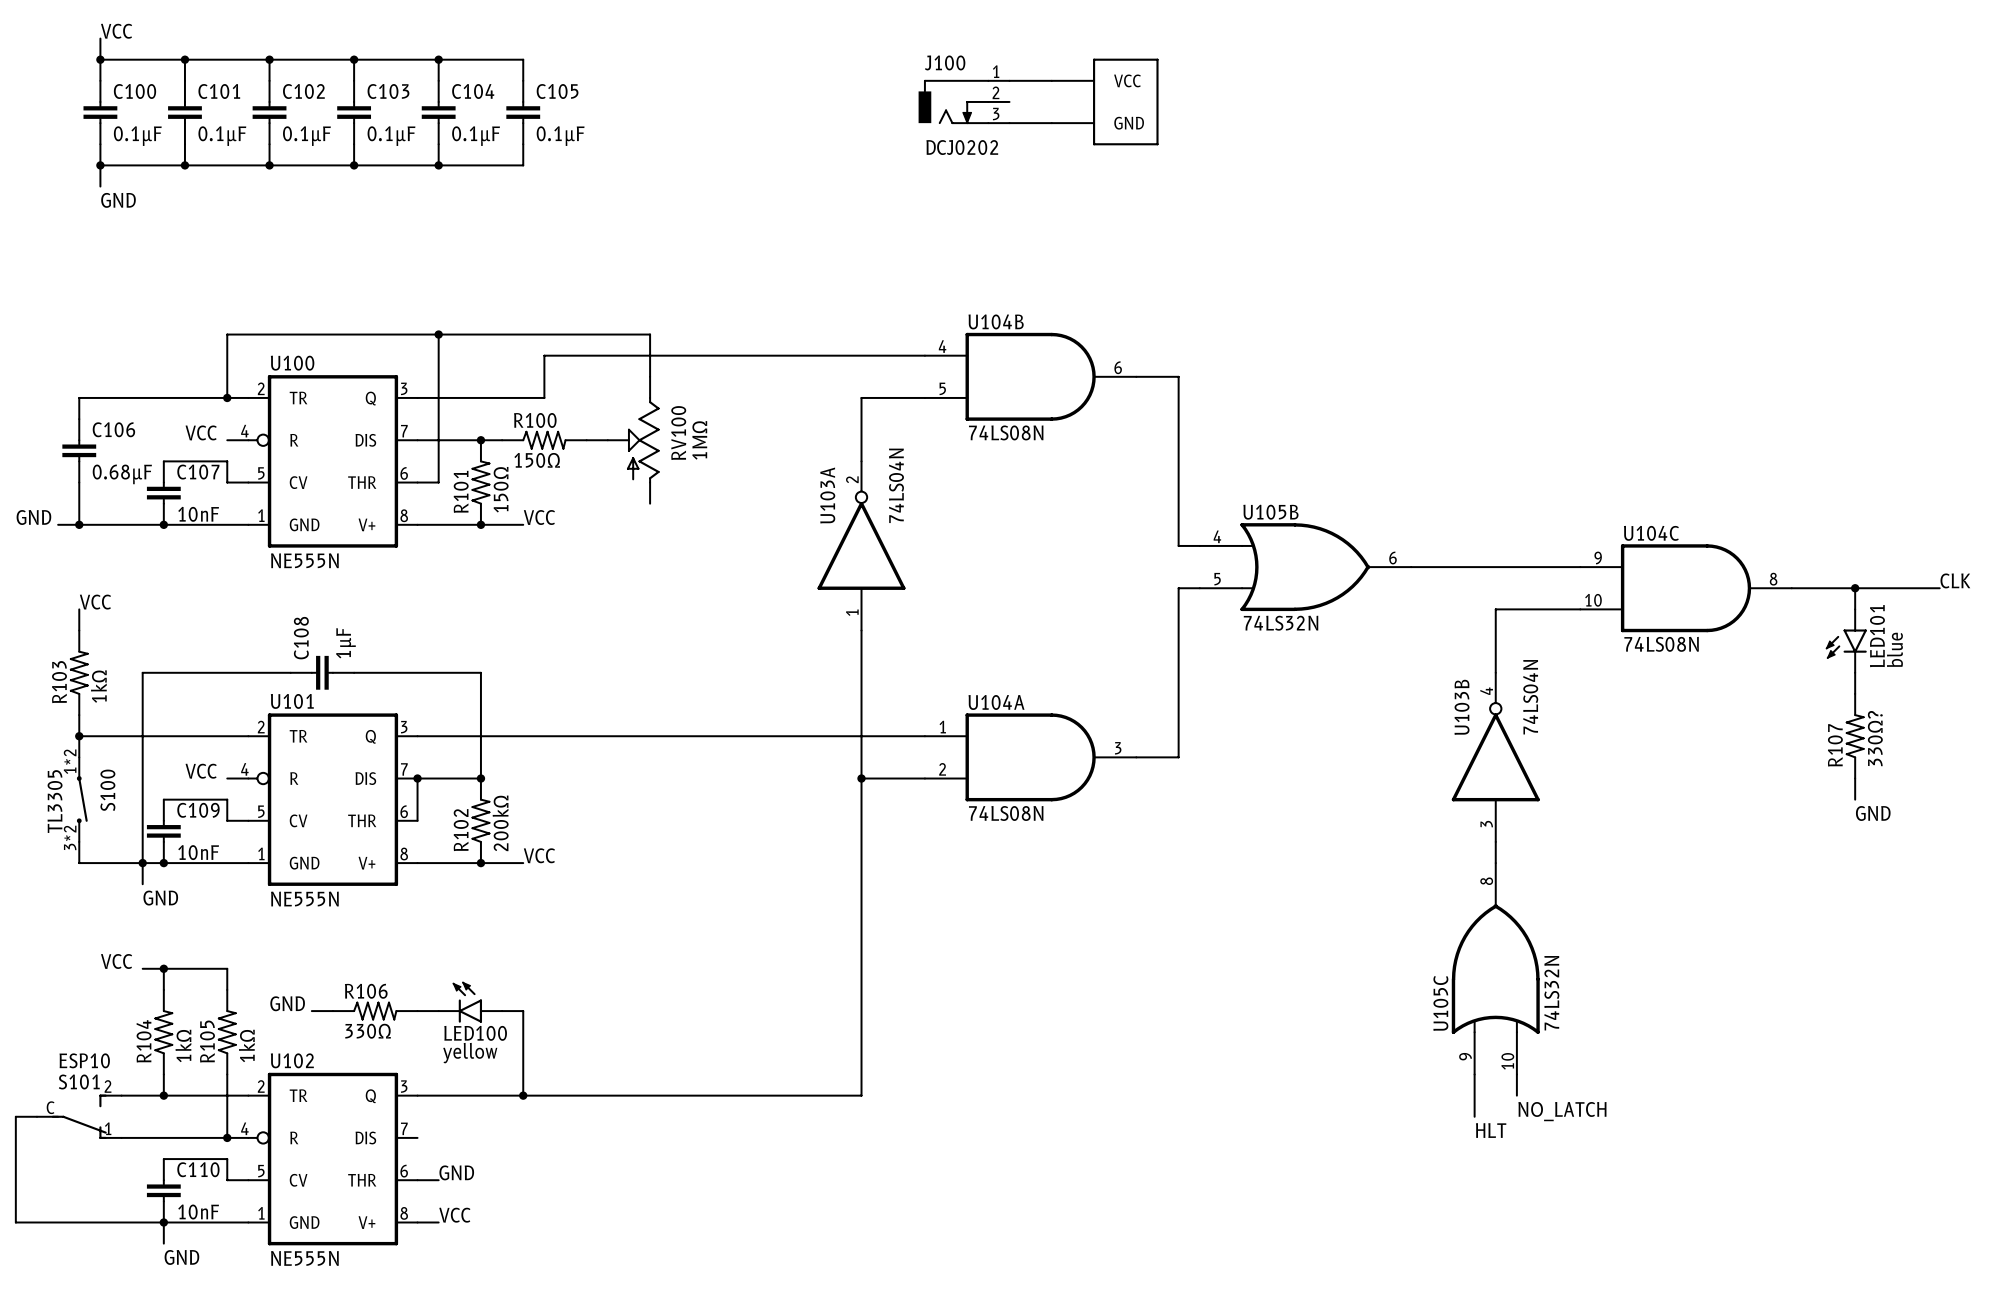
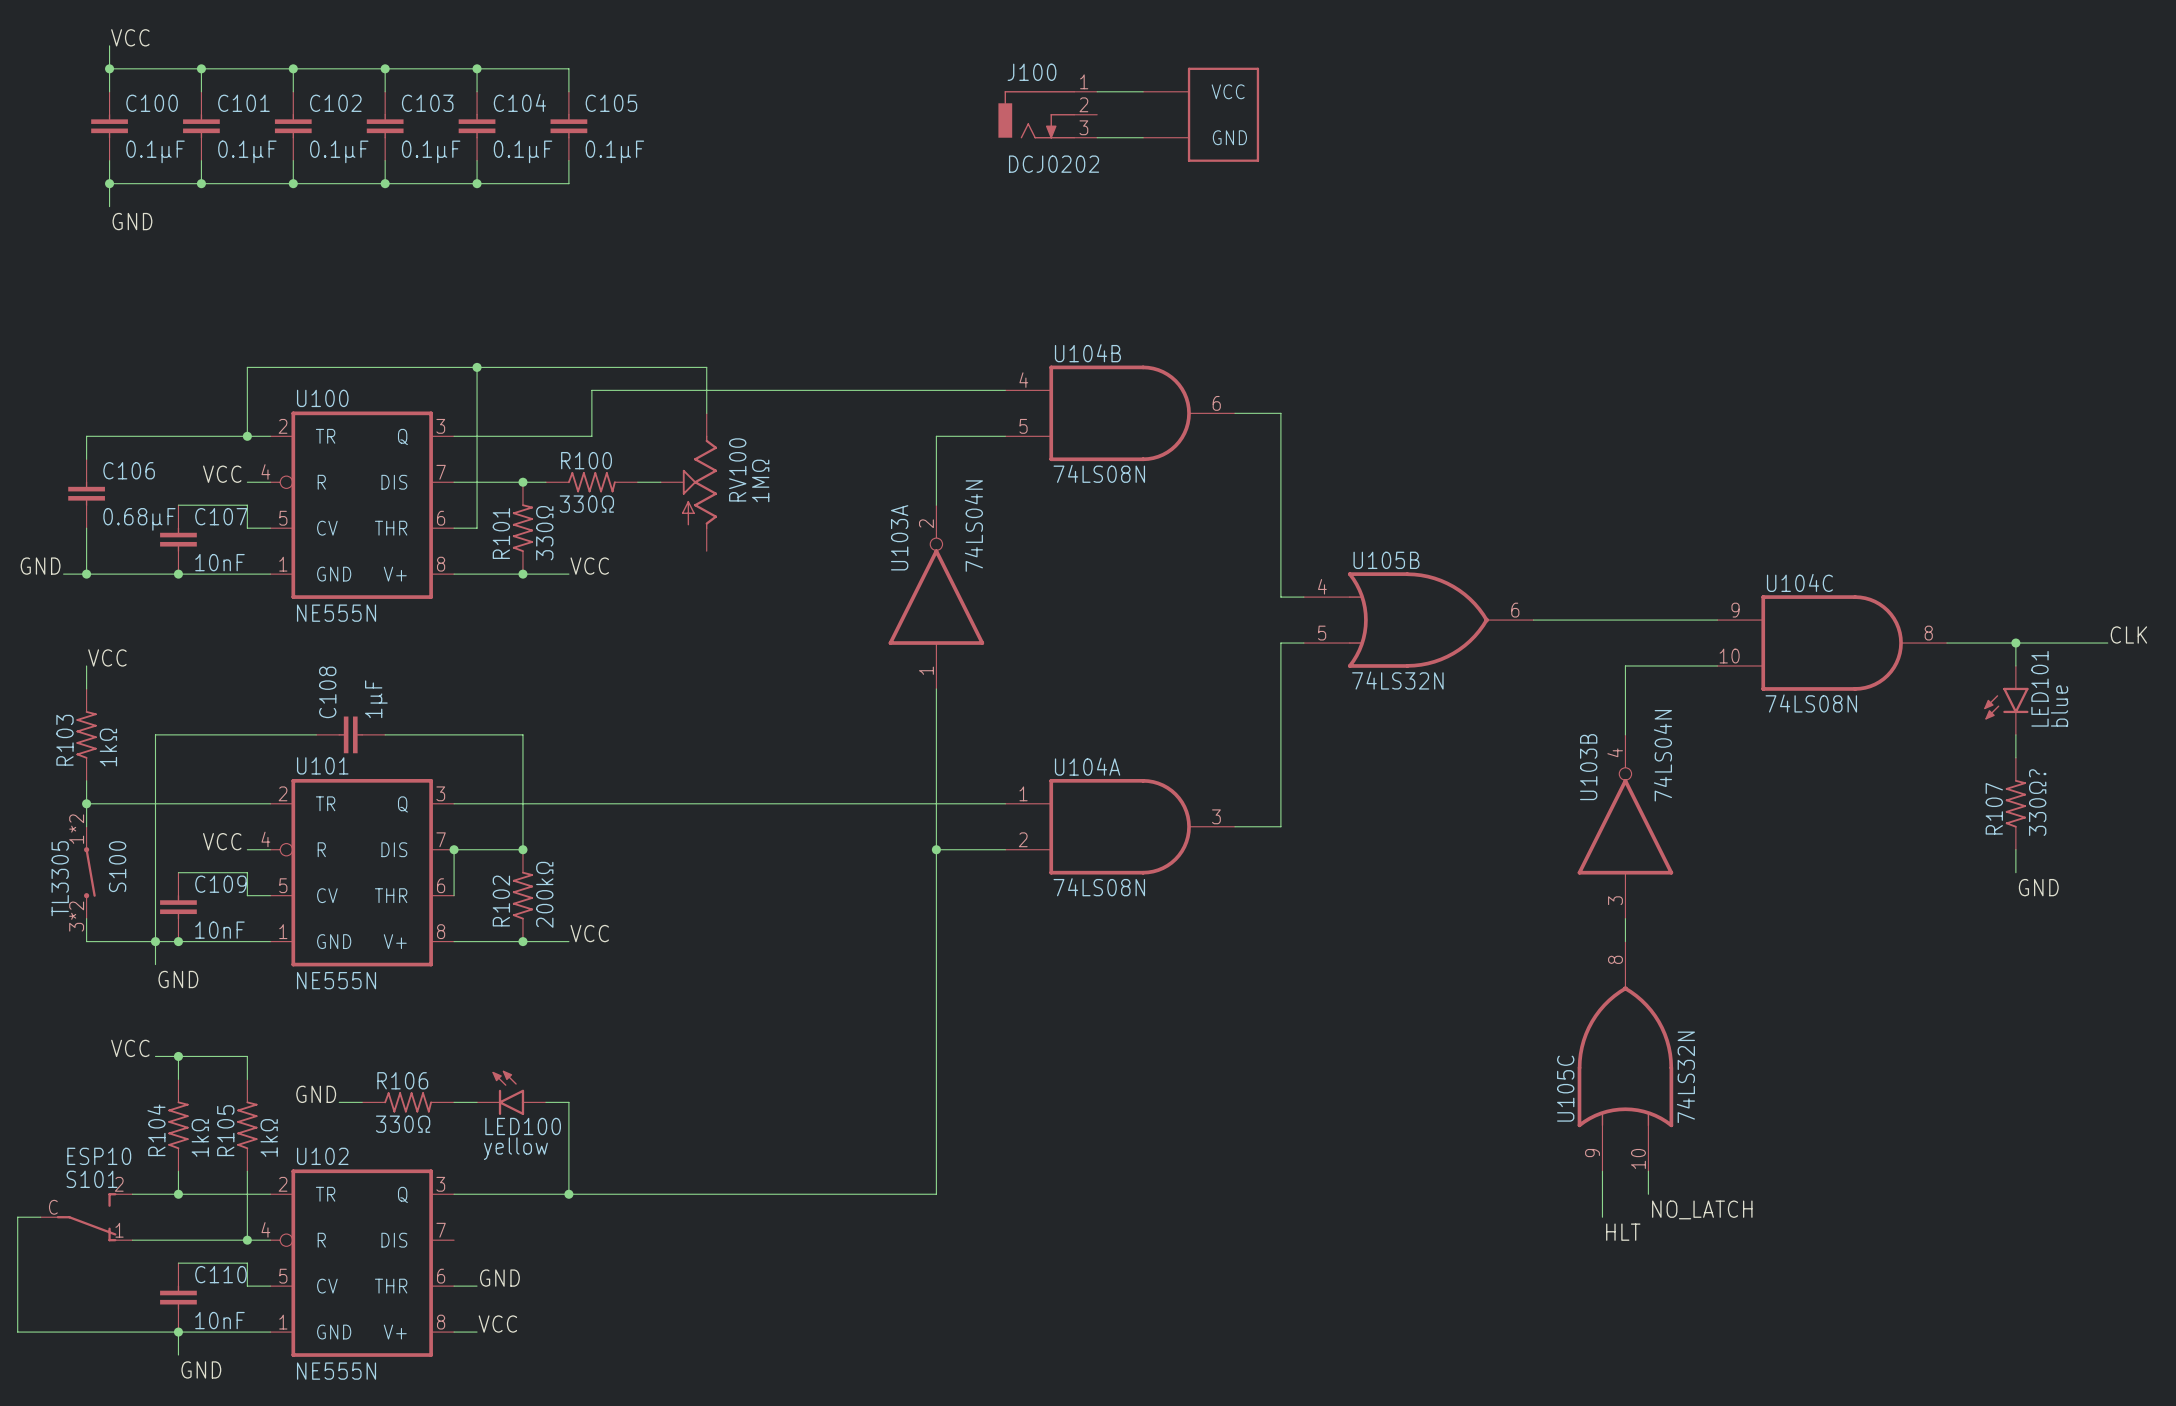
R100 value: 150Ω (537, 460) -> 330Ω (586, 504)
R101 value: 150Ω (501, 489) -> 330Ω (544, 533)

